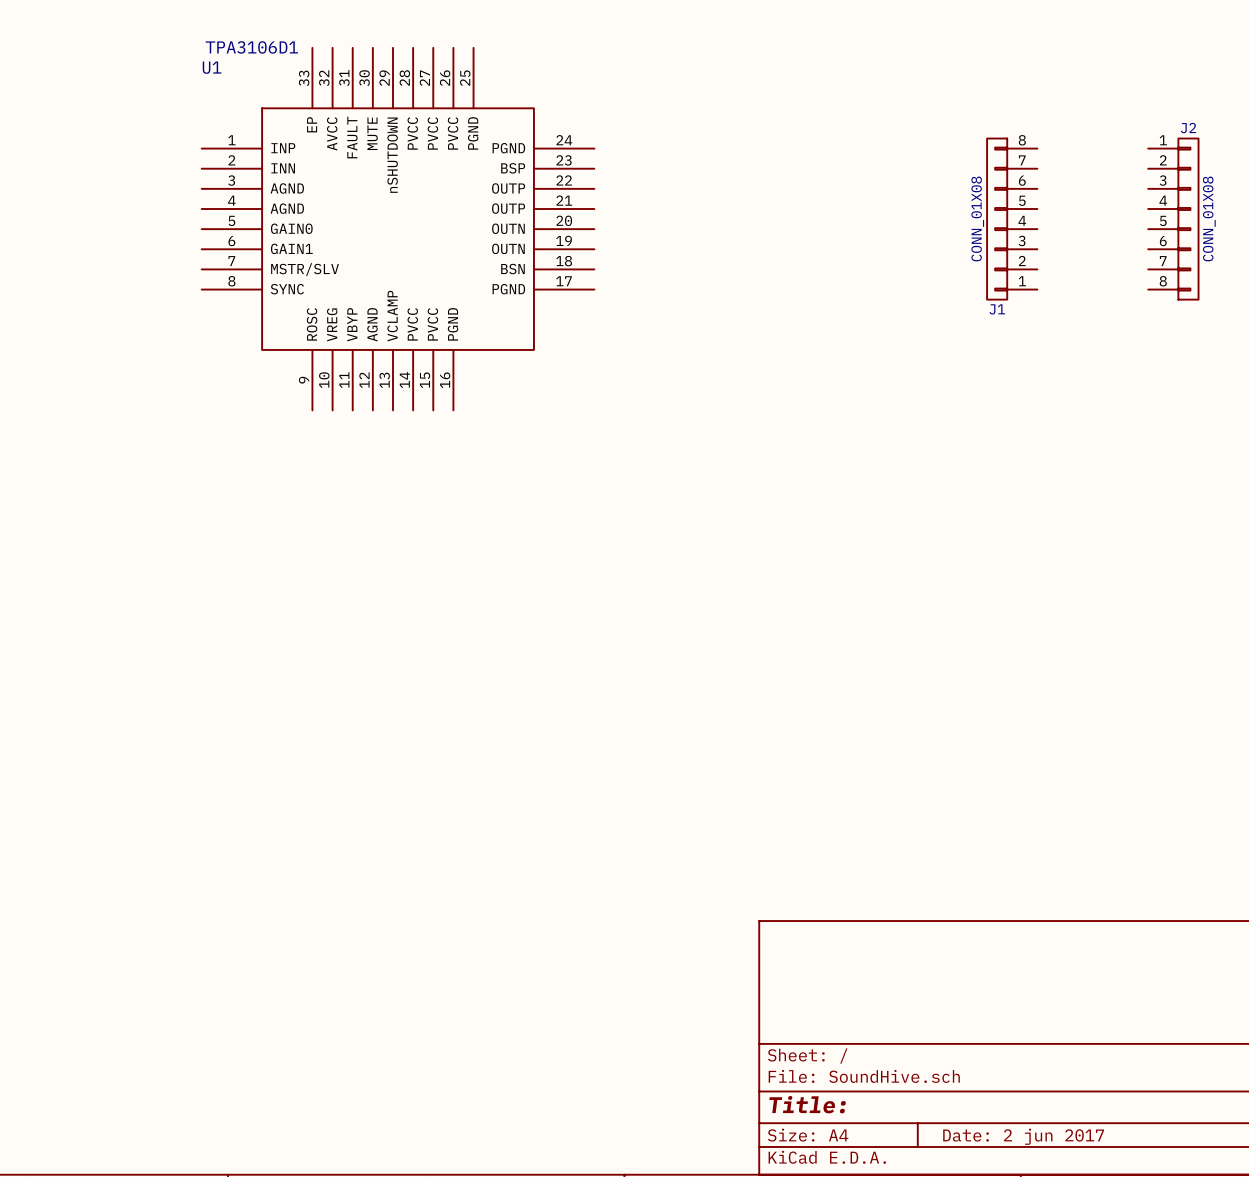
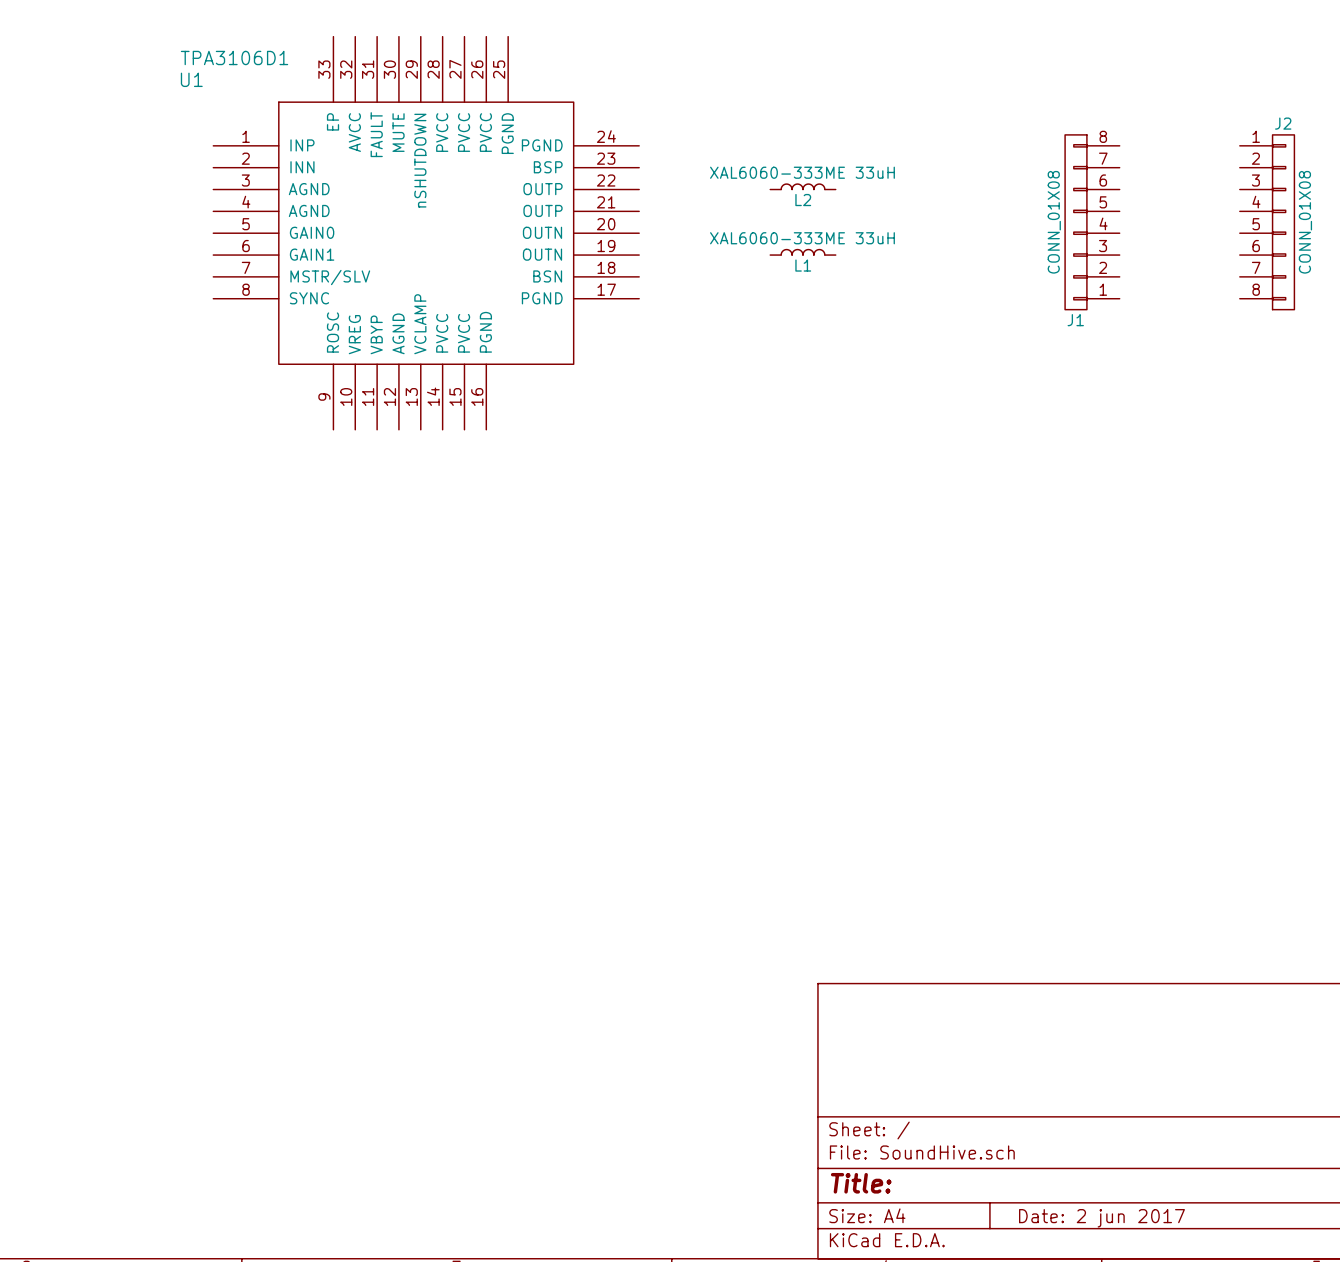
U1 value position: TPA3106D1 (251, 47) -> TPA3106D1 (234, 57)
U1 name position: U1 (212, 67) -> U1 (191, 79)
L2: none -> XAL6060-333ME 33uH (802, 186)
L1: none -> XAL6060-333ME 33uH (802, 252)

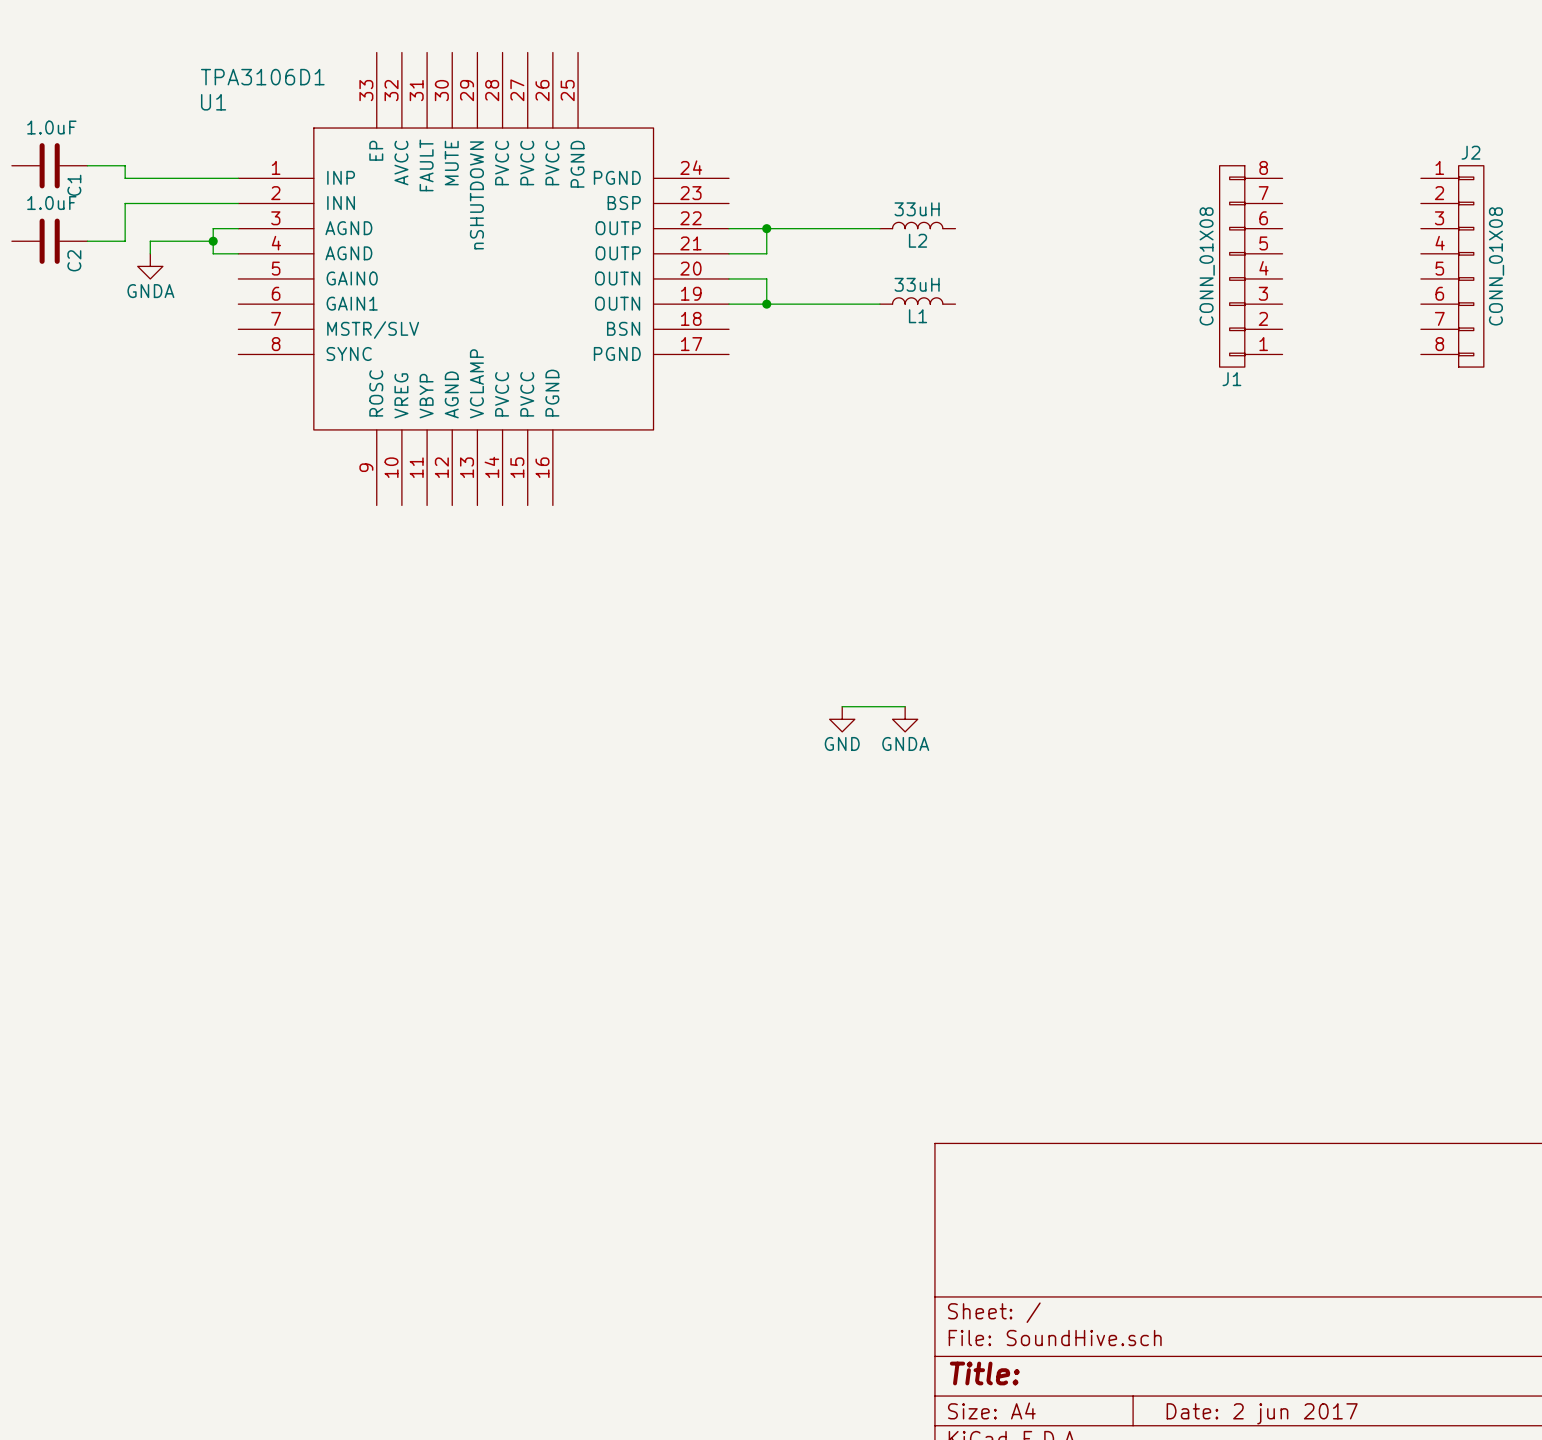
C1: none -> 1.0uF (49, 165)
wire: none -> (87, 165) (125, 165) (125, 178) (238, 178)
wire: none -> (238, 203) (125, 203) (125, 241) (87, 241)
L2 value: XAL6060-333ME 33uH (802, 172) -> 33uH (917, 209)
wire: none -> (238, 228) (213, 228) (213, 253) (238, 253)
wire: none -> (729, 228) (879, 228)
wire: none -> (766, 228) (766, 253) (729, 253)
junction: none -> (766, 228)
C2: none -> 1.0uF (49, 241)
wire: none -> (213, 241) (150, 241) (150, 253)
junction: none -> (213, 241)
power symbol: none -> GNDA (150, 266)
wire: none -> (729, 278) (766, 278) (766, 304)
L1 value: XAL6060-333ME 33uH (802, 238) -> 33uH (917, 284)
wire: none -> (729, 304) (879, 304)
junction: none -> (766, 304)
wire: none -> (842, 706) (905, 706)
power symbol: none -> GND (842, 719)
power symbol: none -> GNDA (905, 719)

